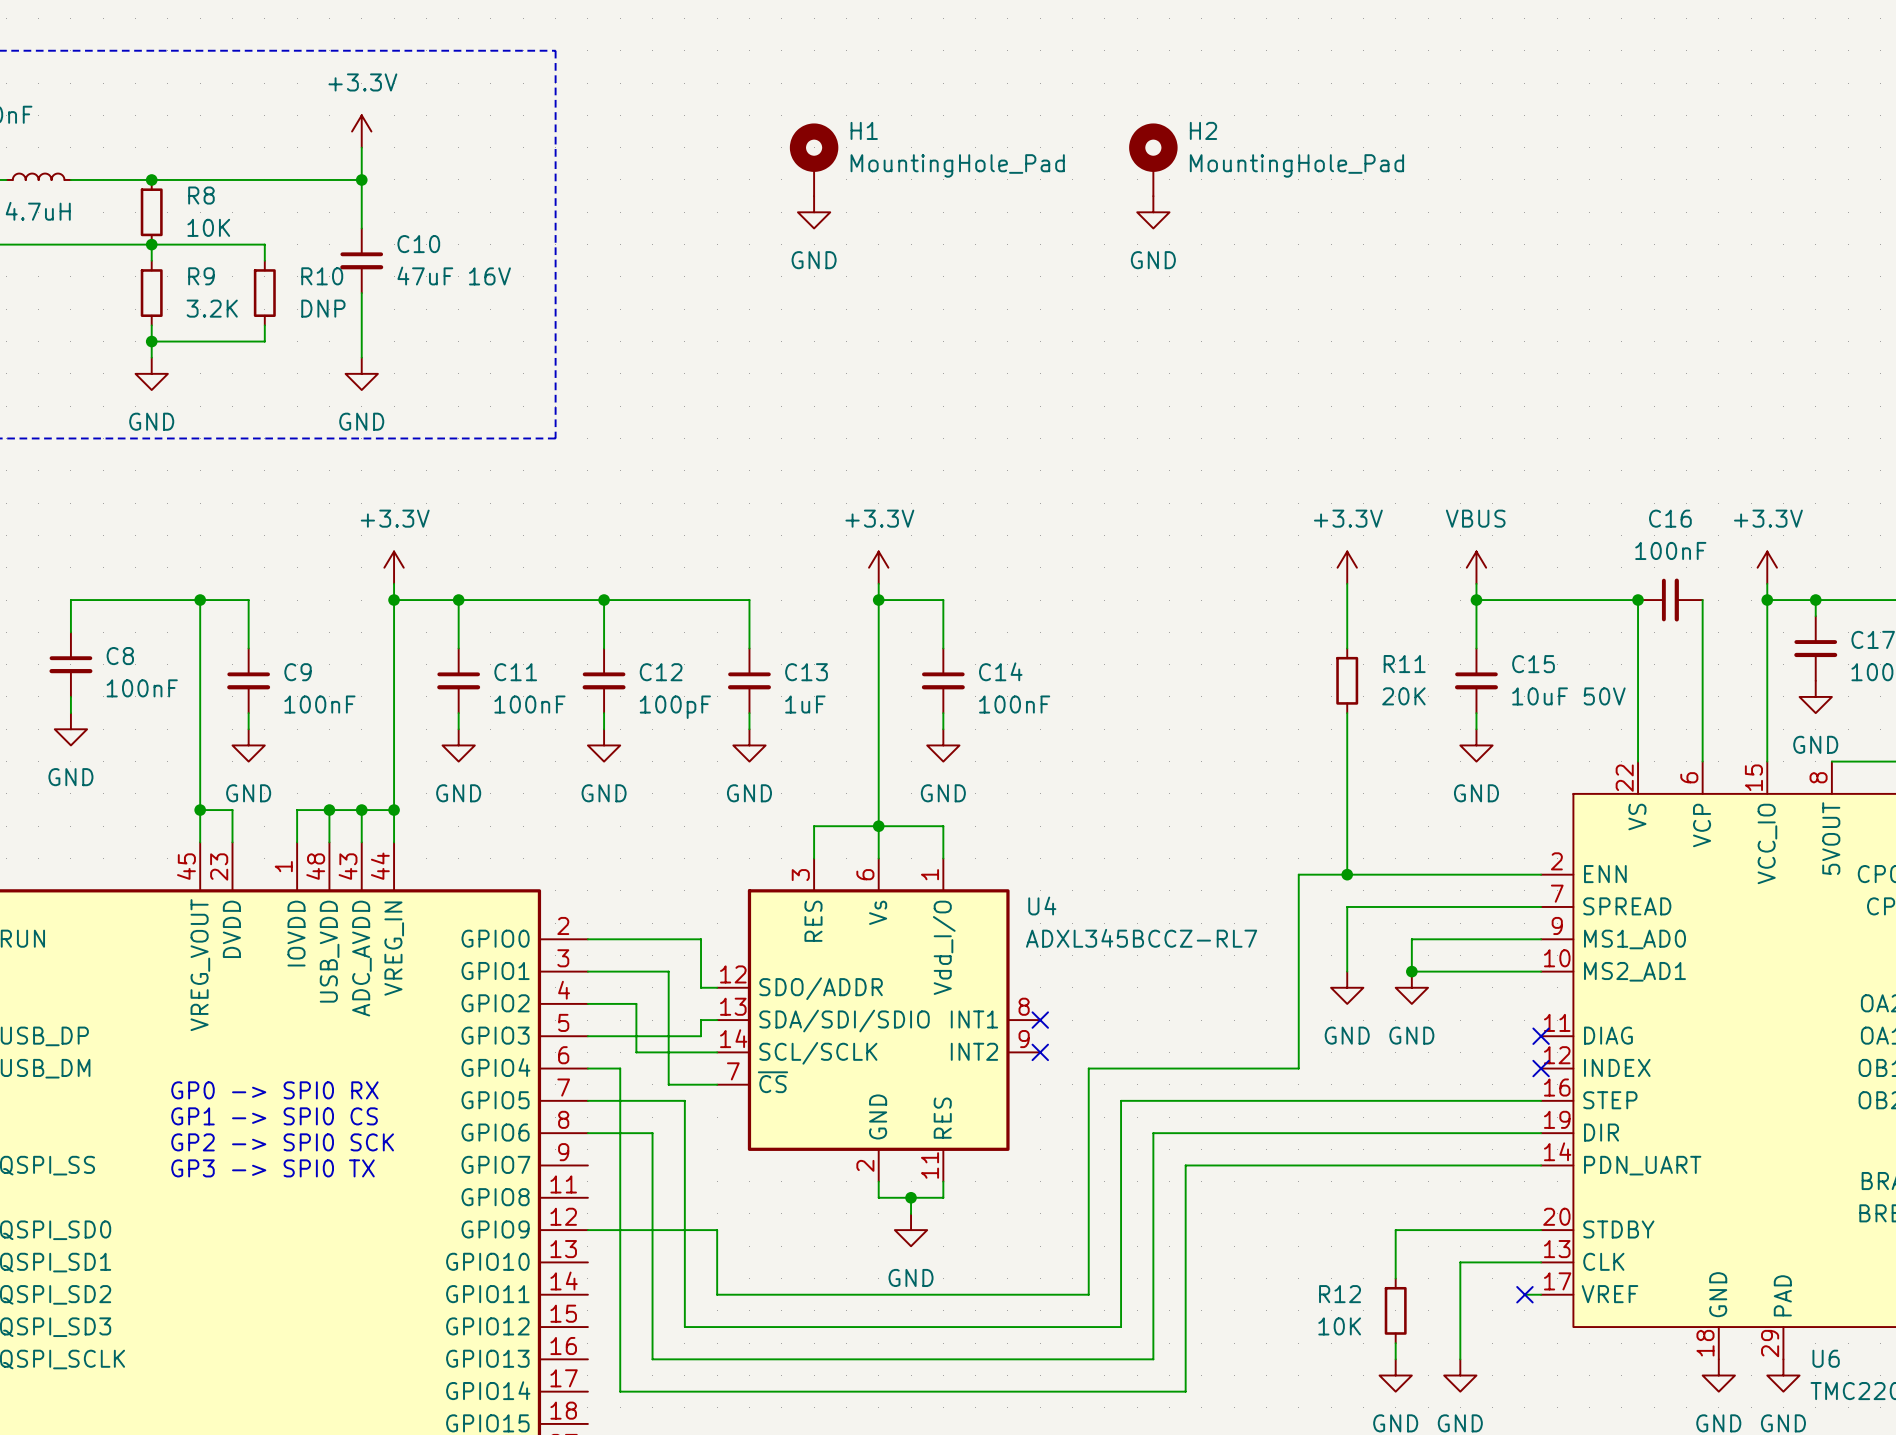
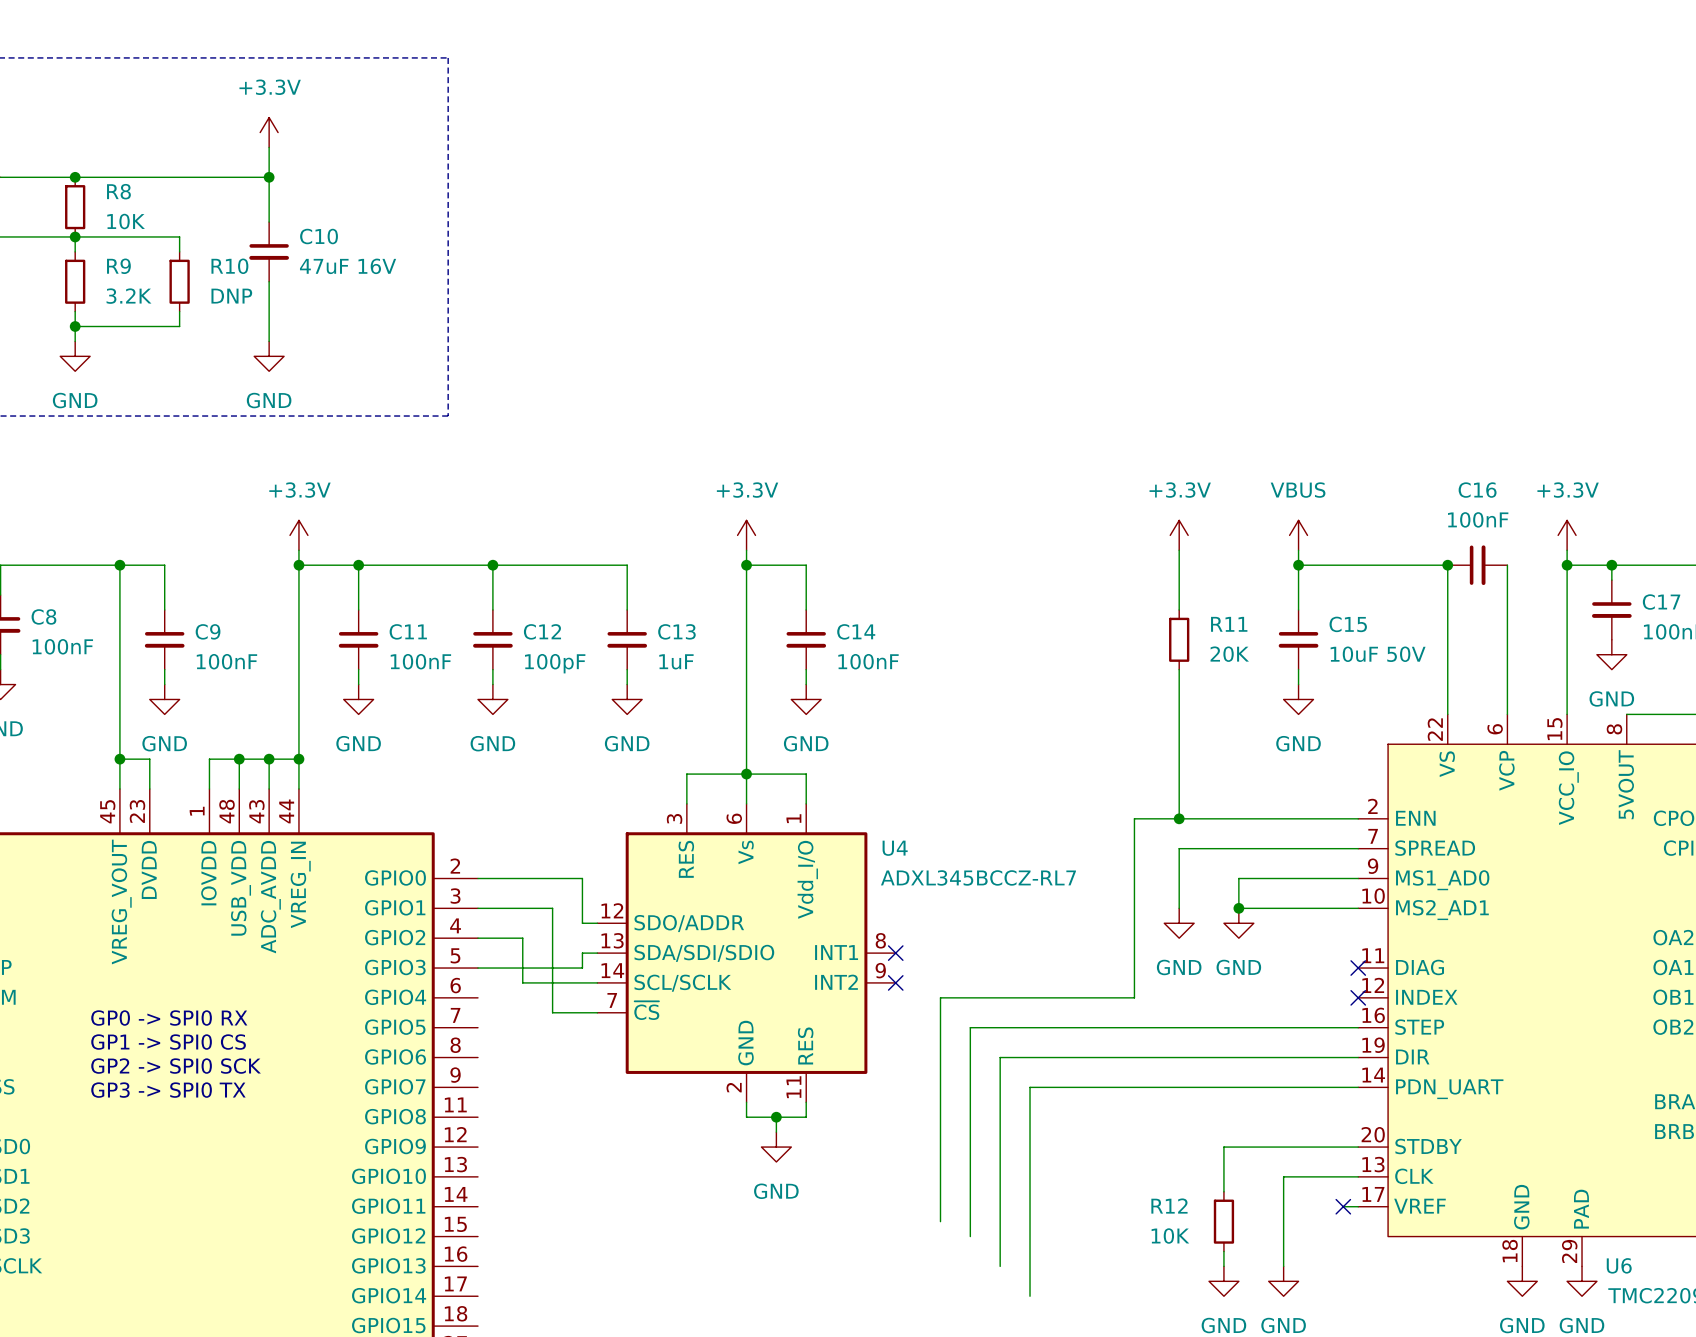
H1: MountingHole_Pad (814, 159) -> none
H2: MountingHole_Pad (1153, 159) -> none
power symbol: GND (814, 212) -> none
power symbol: GND (1153, 212) -> none
wire: (587, 1068) (620, 1068) (620, 1391) (1185, 1391) -> none
wire: (587, 1100) (684, 1100) (684, 1327) (1121, 1327) -> none
wire: (587, 1133) (652, 1133) (652, 1359) (1153, 1359) -> none
wire: (587, 1230) (717, 1230) (717, 1294) (1088, 1294) -> (940, 1221) (940, 1206)

